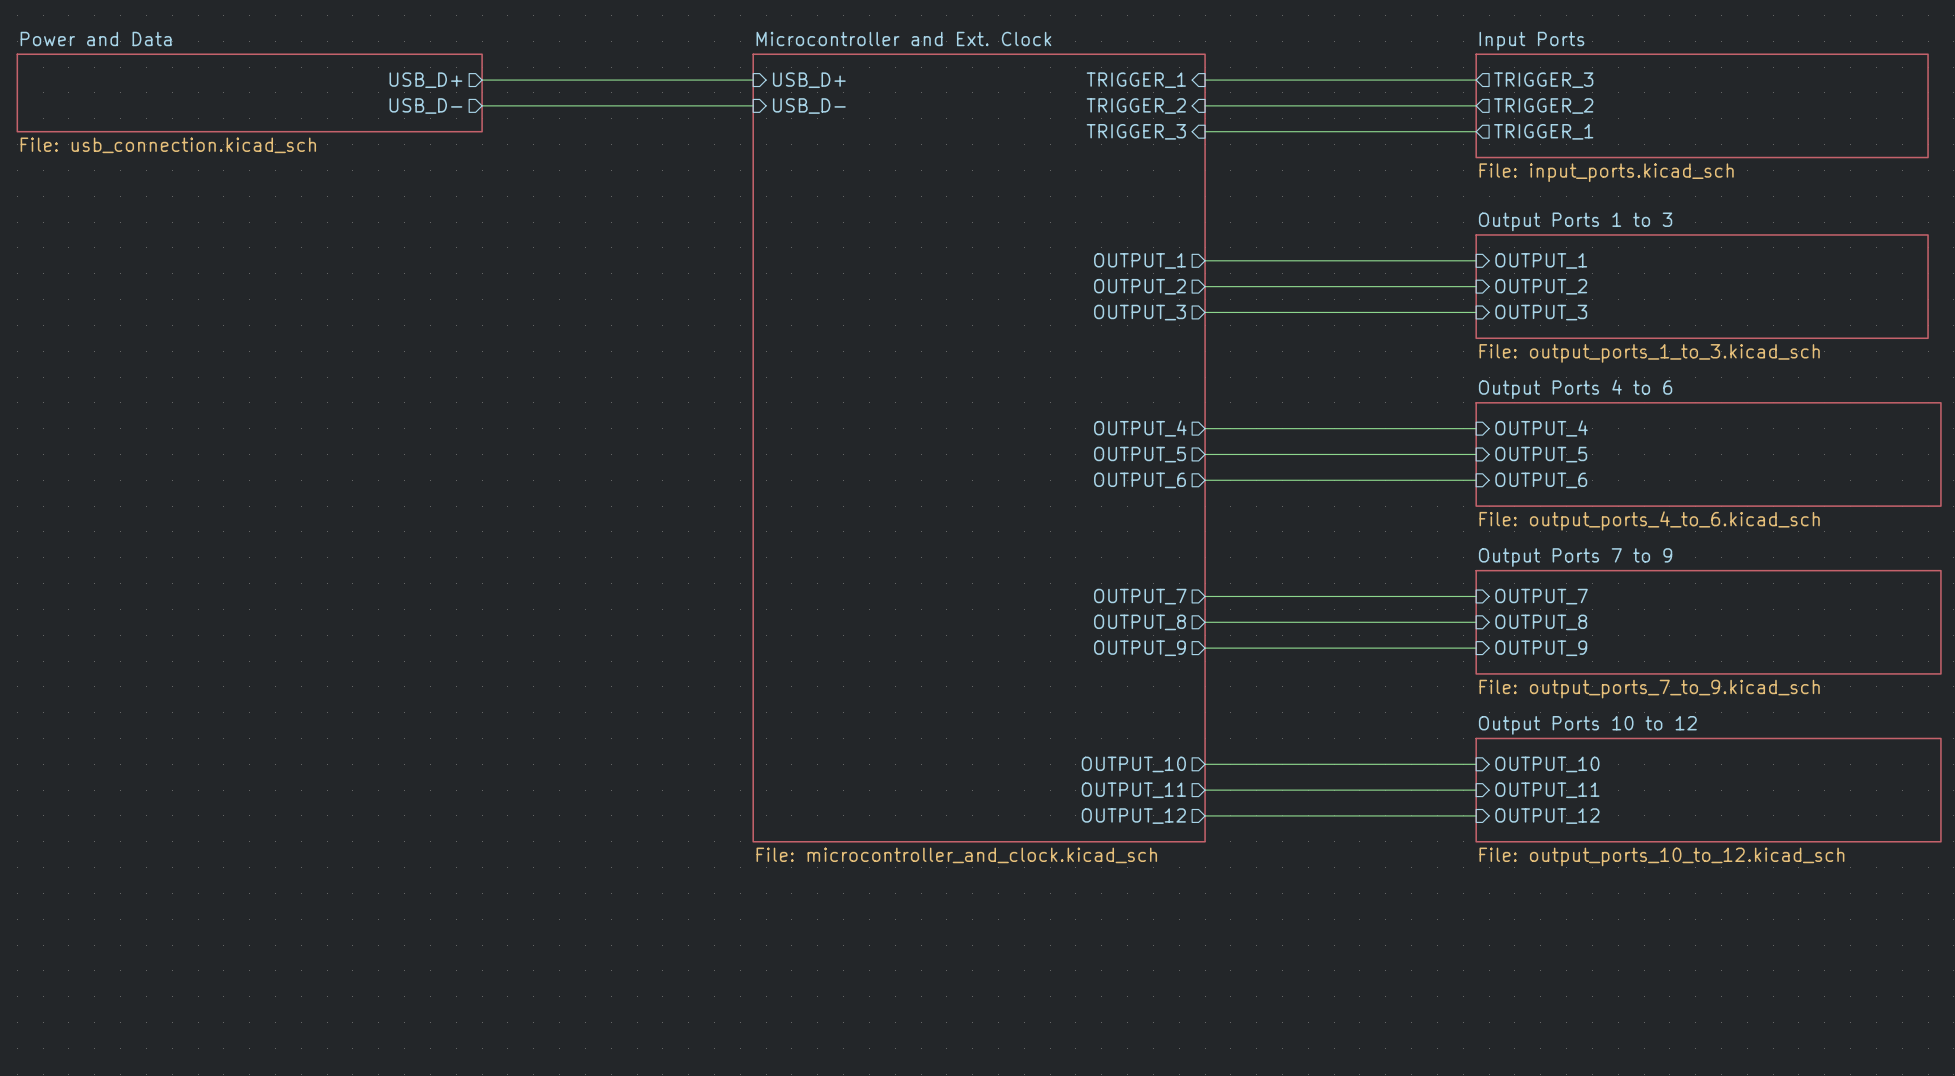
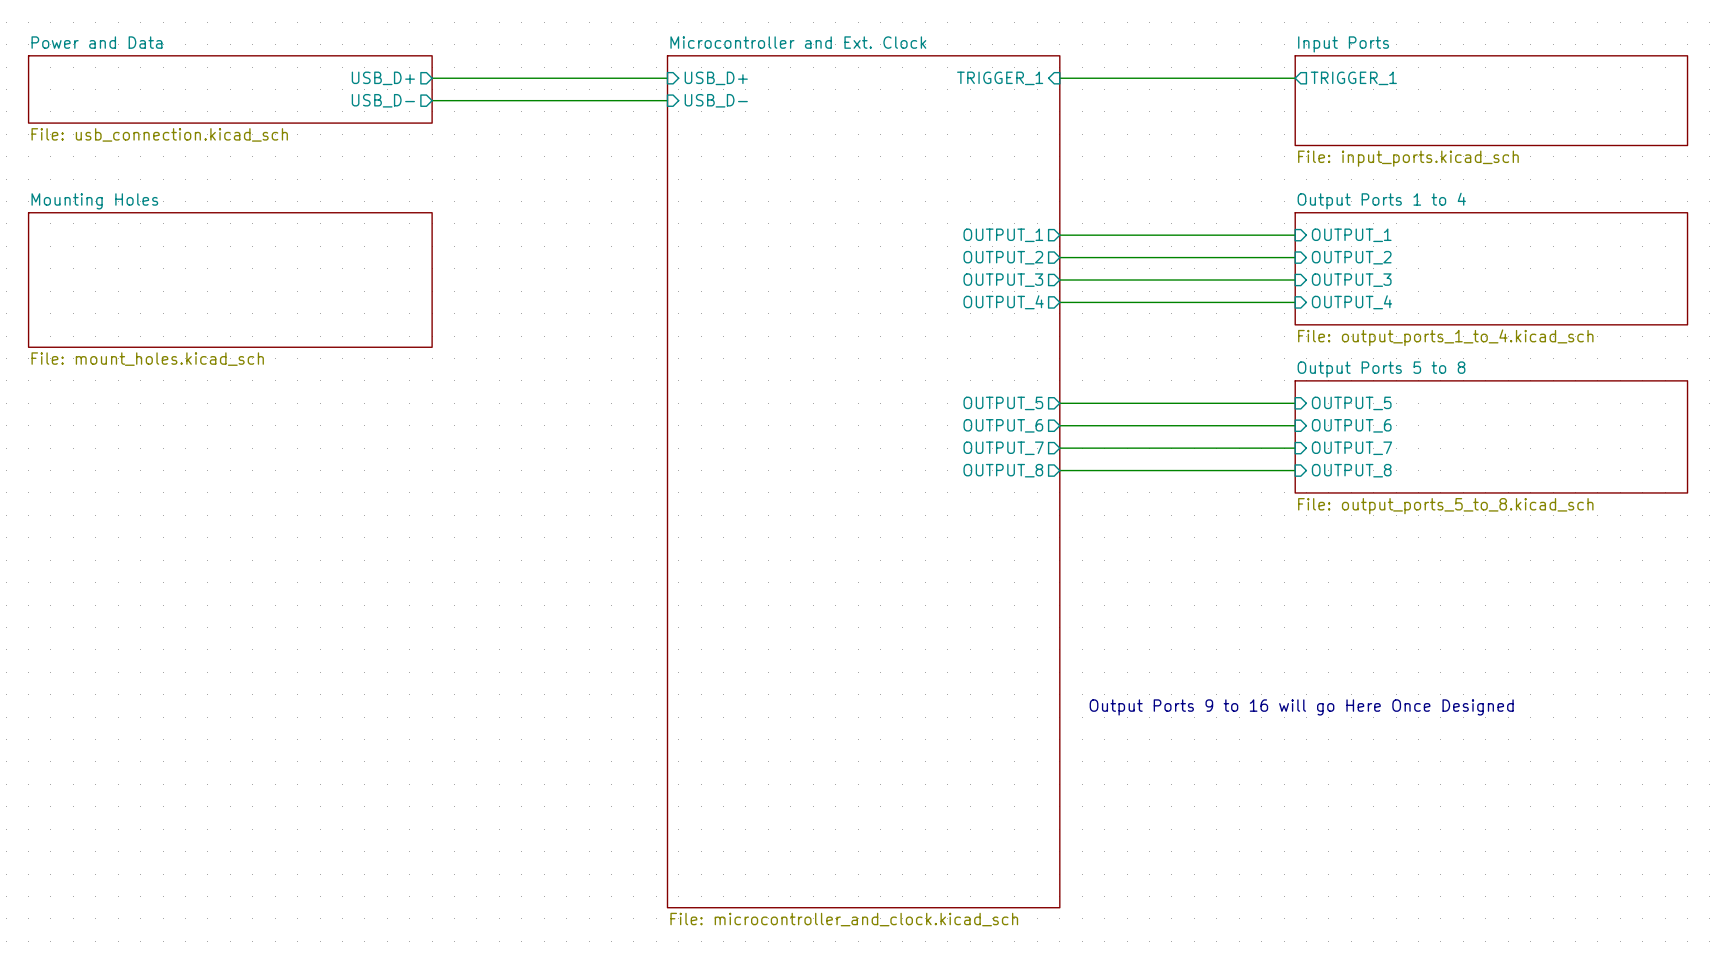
sheet pin: TRIGGER_3 (1543, 80) -> TRIGGER_1 (1353, 78)
wire: (1205, 105) (1476, 105) -> none
sheet pin: TRIGGER_2 (1136, 106) -> none
sheet pin: TRIGGER_2 (1543, 106) -> none
sheet pin: TRIGGER_3 (1136, 131) -> none
wire: (1205, 131) (1476, 131) -> none
sheet pin: TRIGGER_1 (1543, 131) -> none
sheet Output Ports 1 to 3: File: output_ports_1_to_3.kicad_sch (1702, 286) -> none
sheet Output Ports 1 to 4: none -> File: output_ports_1_to_4.kicad_sch (1491, 268)
sheet Mounting Holes: none -> File: mount_holes.kicad_sch (230, 280)
sheet pin position: OUTPUT_4 (1140, 428) -> OUTPUT_4 (1003, 302)
wire: (1205, 428) (1476, 428) -> (1059, 302) (1295, 302)
sheet pin position: OUTPUT_4 (1541, 428) -> OUTPUT_4 (1351, 302)
sheet Microcontroller and Ext. Clock: File: microcontroller_and_clock.kicad_sch (979, 448) -> none
sheet Output Ports 4 to 6: File: output_ports_4_to_6.kicad_sch (1708, 454) -> none
sheet Output Ports 5 to 8: none -> File: output_ports_5_to_8.kicad_sch (1491, 436)
sheet Microcontroller and Ext. Clock: none -> File: microcontroller_and_clock.kicad_sch (863, 481)
sheet pin position: OUTPUT_7 (1140, 596) -> OUTPUT_7 (1003, 448)
wire: (1205, 596) (1476, 596) -> (1059, 448) (1295, 448)
sheet pin position: OUTPUT_7 (1541, 596) -> OUTPUT_7 (1351, 448)
sheet pin position: OUTPUT_8 (1140, 622) -> OUTPUT_8 (1003, 470)
wire: (1205, 622) (1476, 622) -> (1059, 470) (1295, 470)
sheet pin position: OUTPUT_8 (1541, 622) -> OUTPUT_8 (1351, 470)
sheet Output Ports 7 to 9: File: output_ports_7_to_9.kicad_sch (1708, 622) -> none
sheet pin: OUTPUT_9 (1140, 648) -> none
wire: (1205, 648) (1476, 648) -> none
sheet pin: OUTPUT_9 (1541, 648) -> none
sheet pin: OUTPUT_10 (1133, 764) -> none
wire: (1205, 764) (1476, 764) -> none
sheet pin: OUTPUT_10 (1547, 764) -> none
sheet pin: OUTPUT_11 (1133, 790) -> none
wire: (1205, 790) (1476, 790) -> none
sheet pin: OUTPUT_11 (1547, 790) -> none
sheet Output Ports 10 to 12: File: output_ports_10_to_12.kicad_sch (1708, 790) -> none
text: none -> Output Ports 9 to 16 will go Here Once Designed (1301, 707)
wire: (1205, 815) (1476, 815) -> none
sheet pin: OUTPUT_12 (1133, 816) -> none
sheet pin: OUTPUT_12 (1547, 816) -> none

